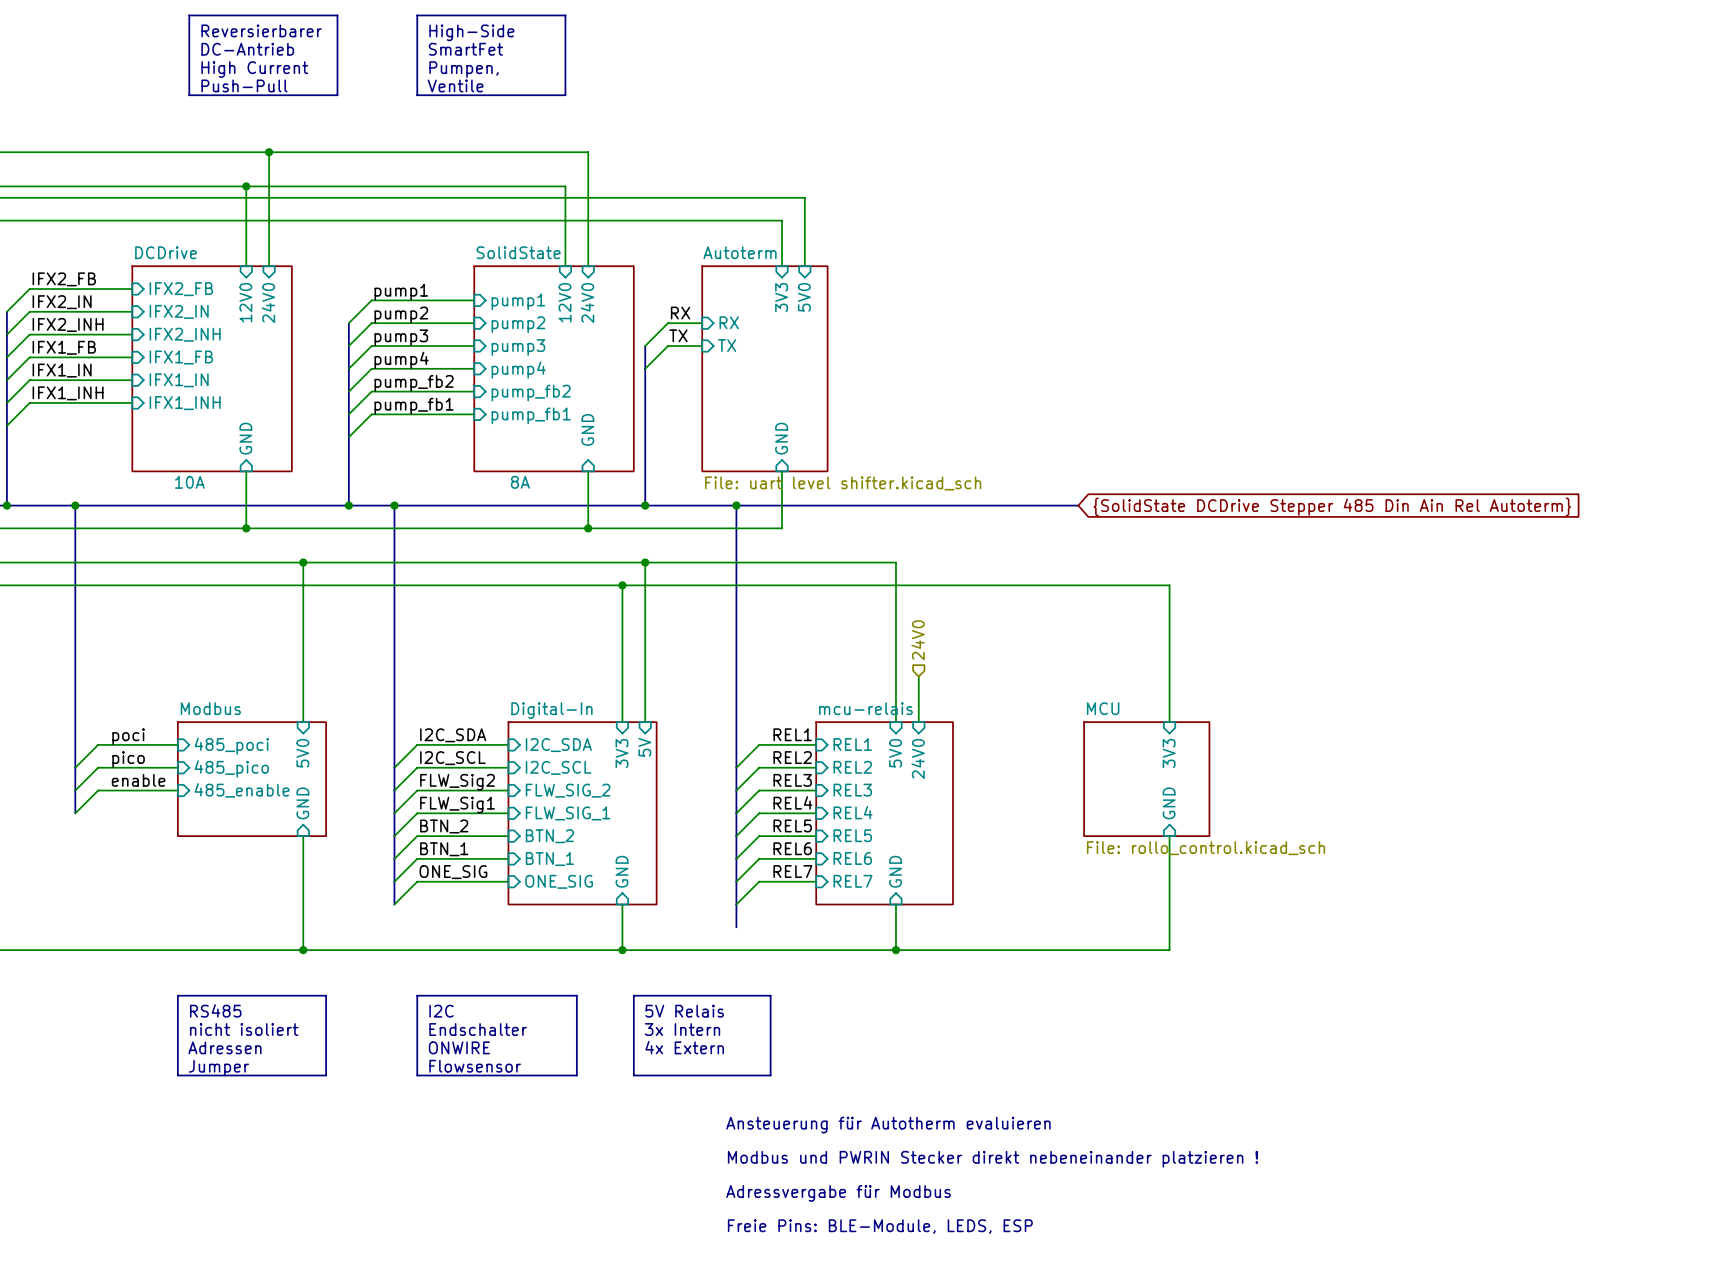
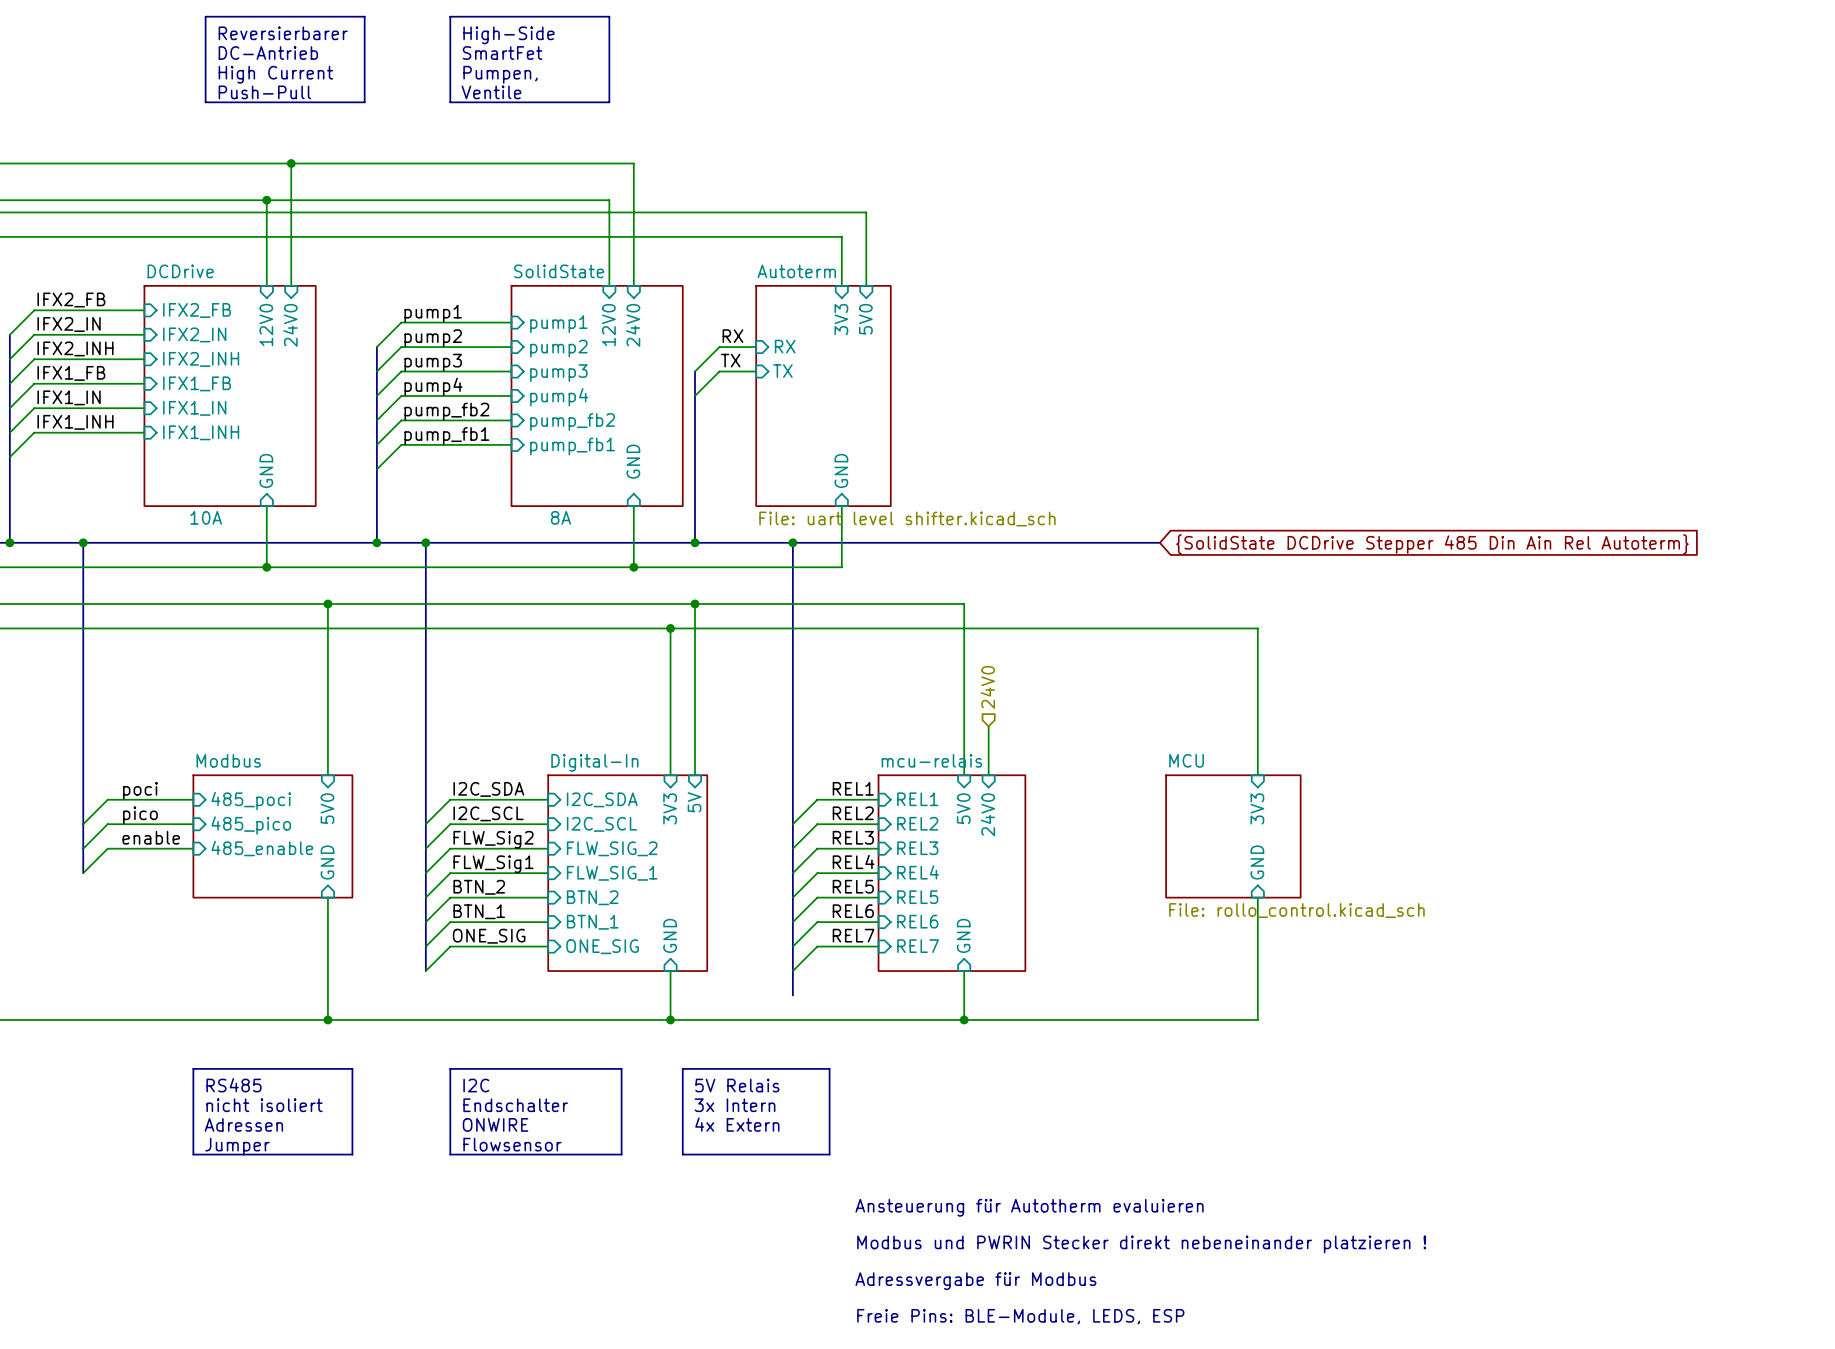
text position: Ansteuerung für Autotherm evaluieren (888, 1125) -> Ansteuerung für Autotherm evaluieren (1029, 1207)
text position: Modbus und PWRIN Stecker direkt nebeneinander platzieren ! (992, 1159) -> Modbus und PWRIN Stecker direkt nebeneinander platzieren ! (1141, 1244)
text position: Adressvergabe für Modbus (838, 1193) -> Adressvergabe für Modbus (975, 1281)
text position: Freie Pins: BLE-Module, LEDS, ESP (880, 1226) -> Freie Pins: BLE-Module, LEDS, ESP (1020, 1316)

